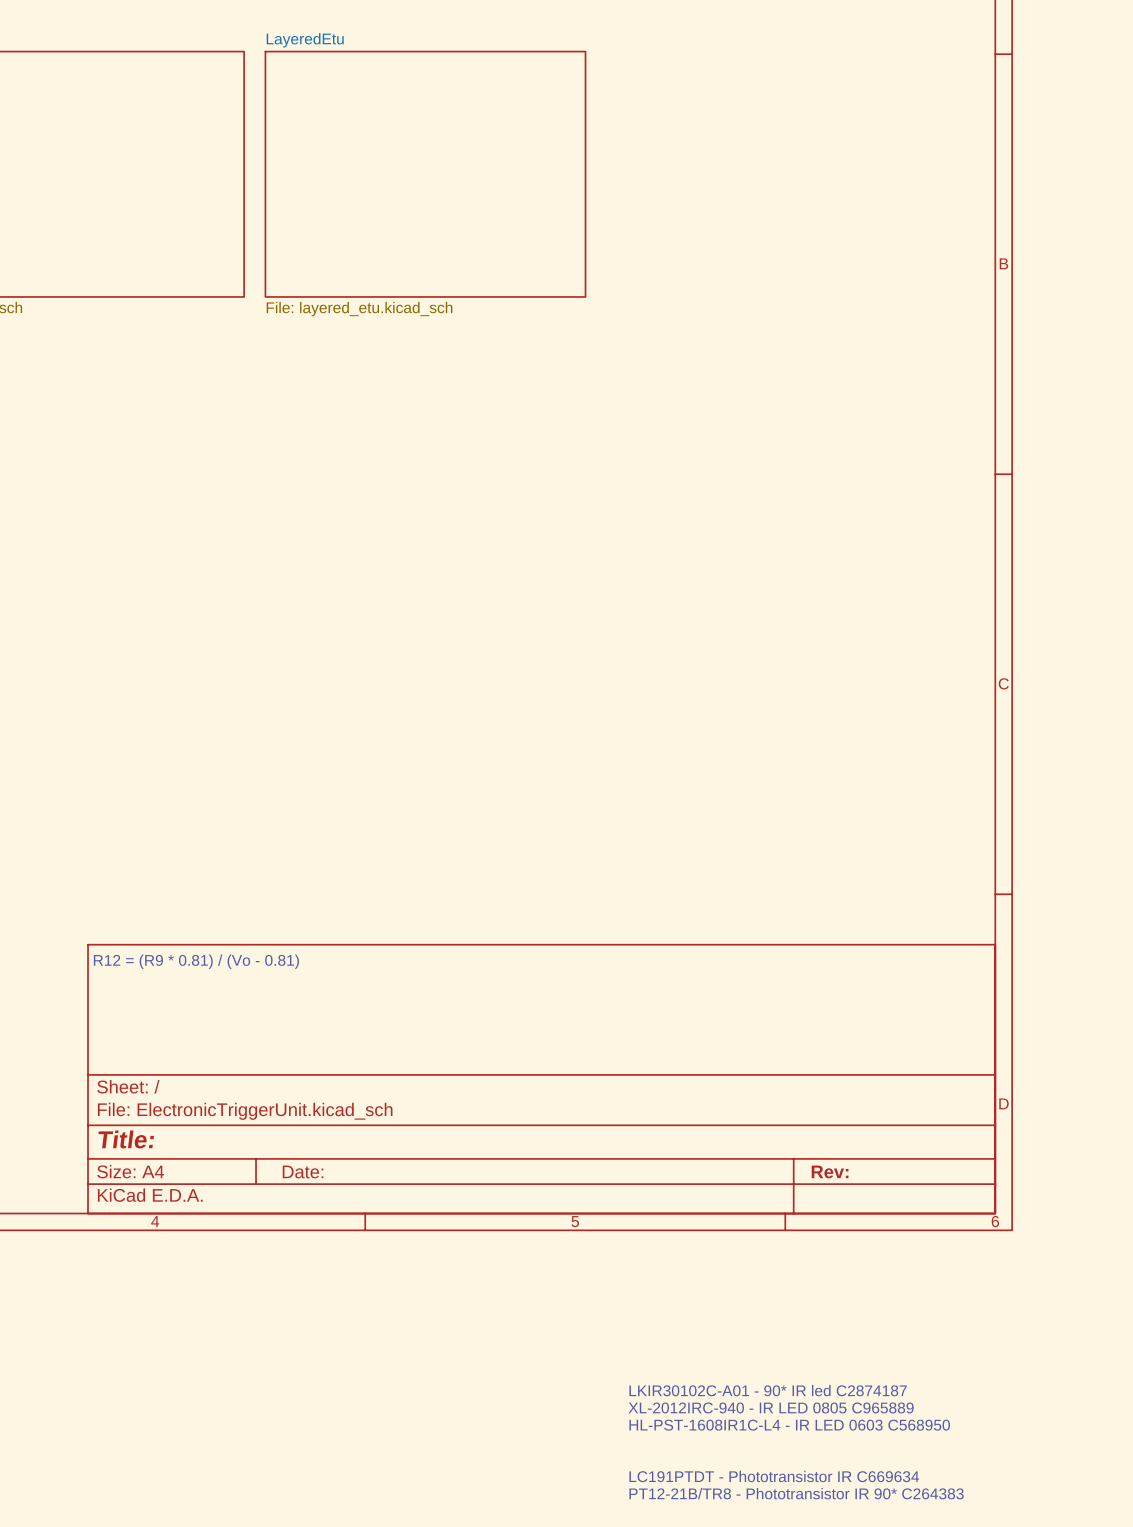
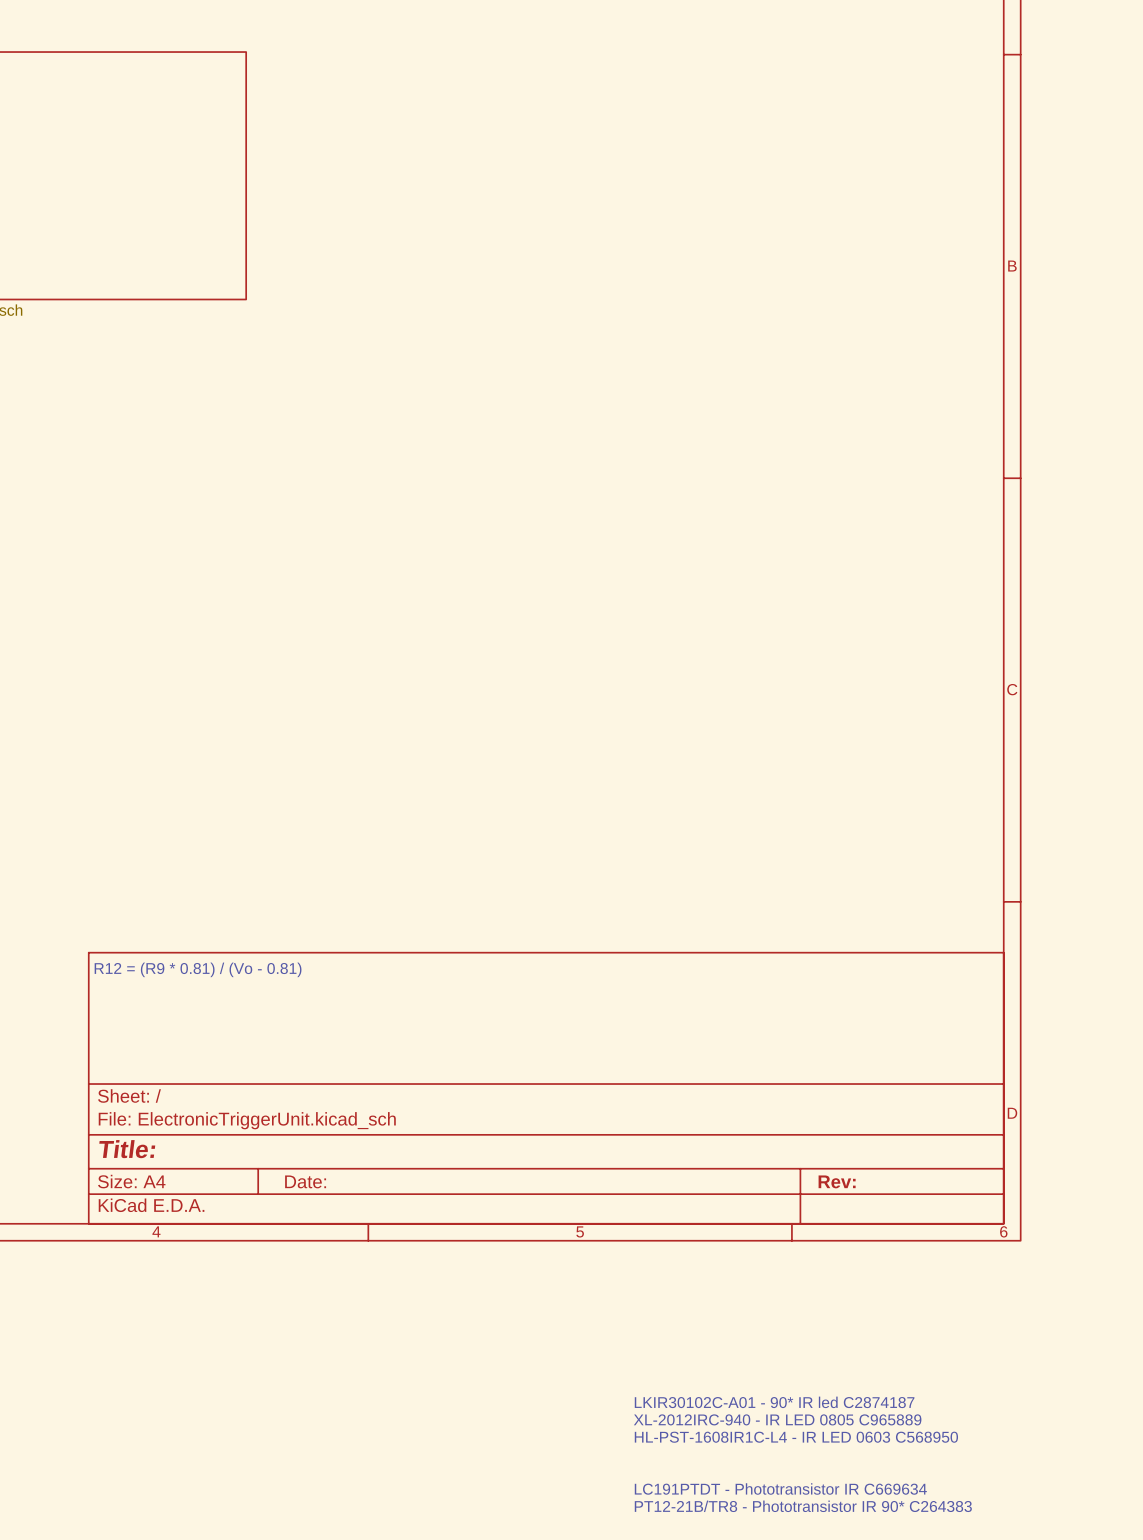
sheet LayeredEtu: File: layered_etu.kicad_sch (425, 174) -> none

